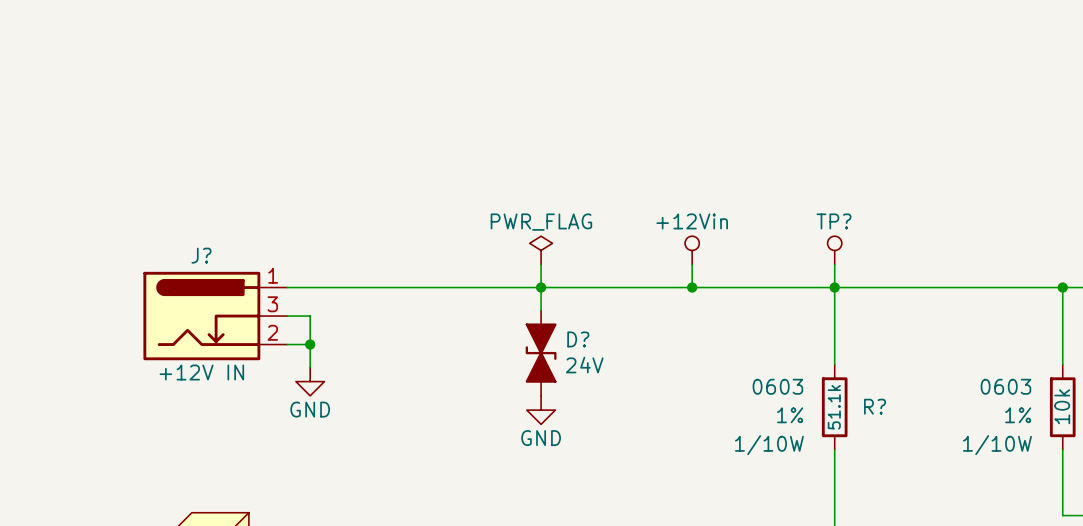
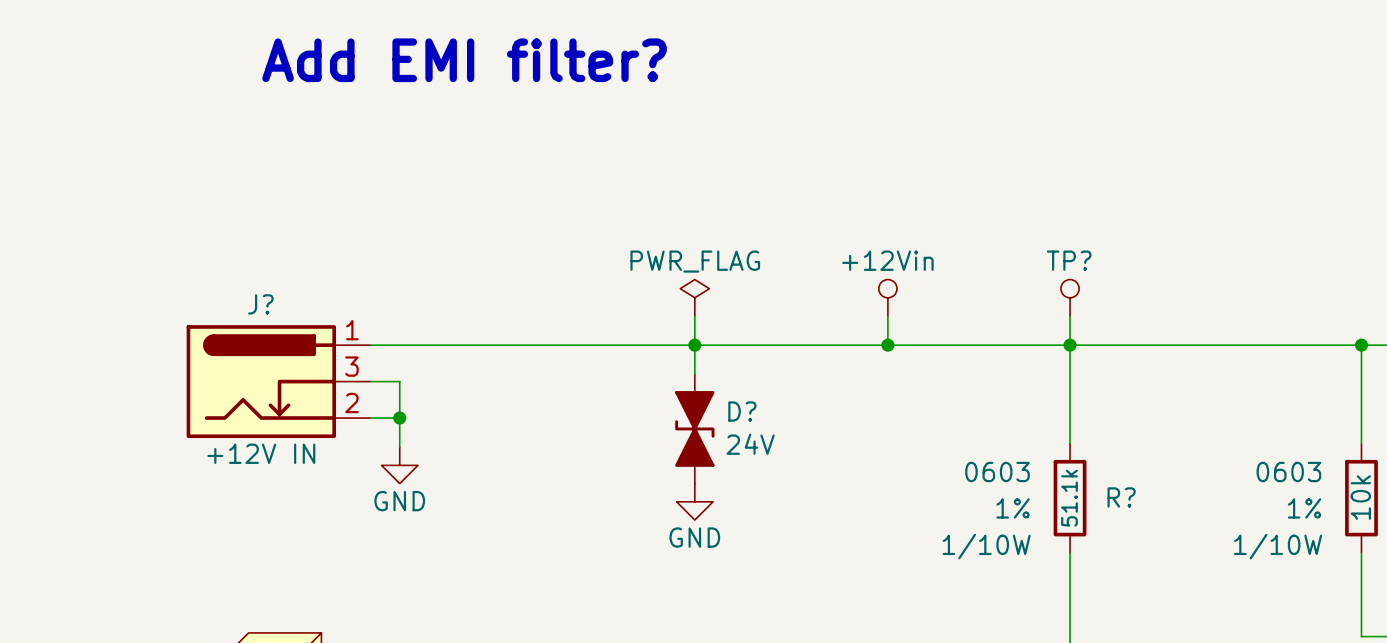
text: none -> Add EMI filter? (464, 60)

